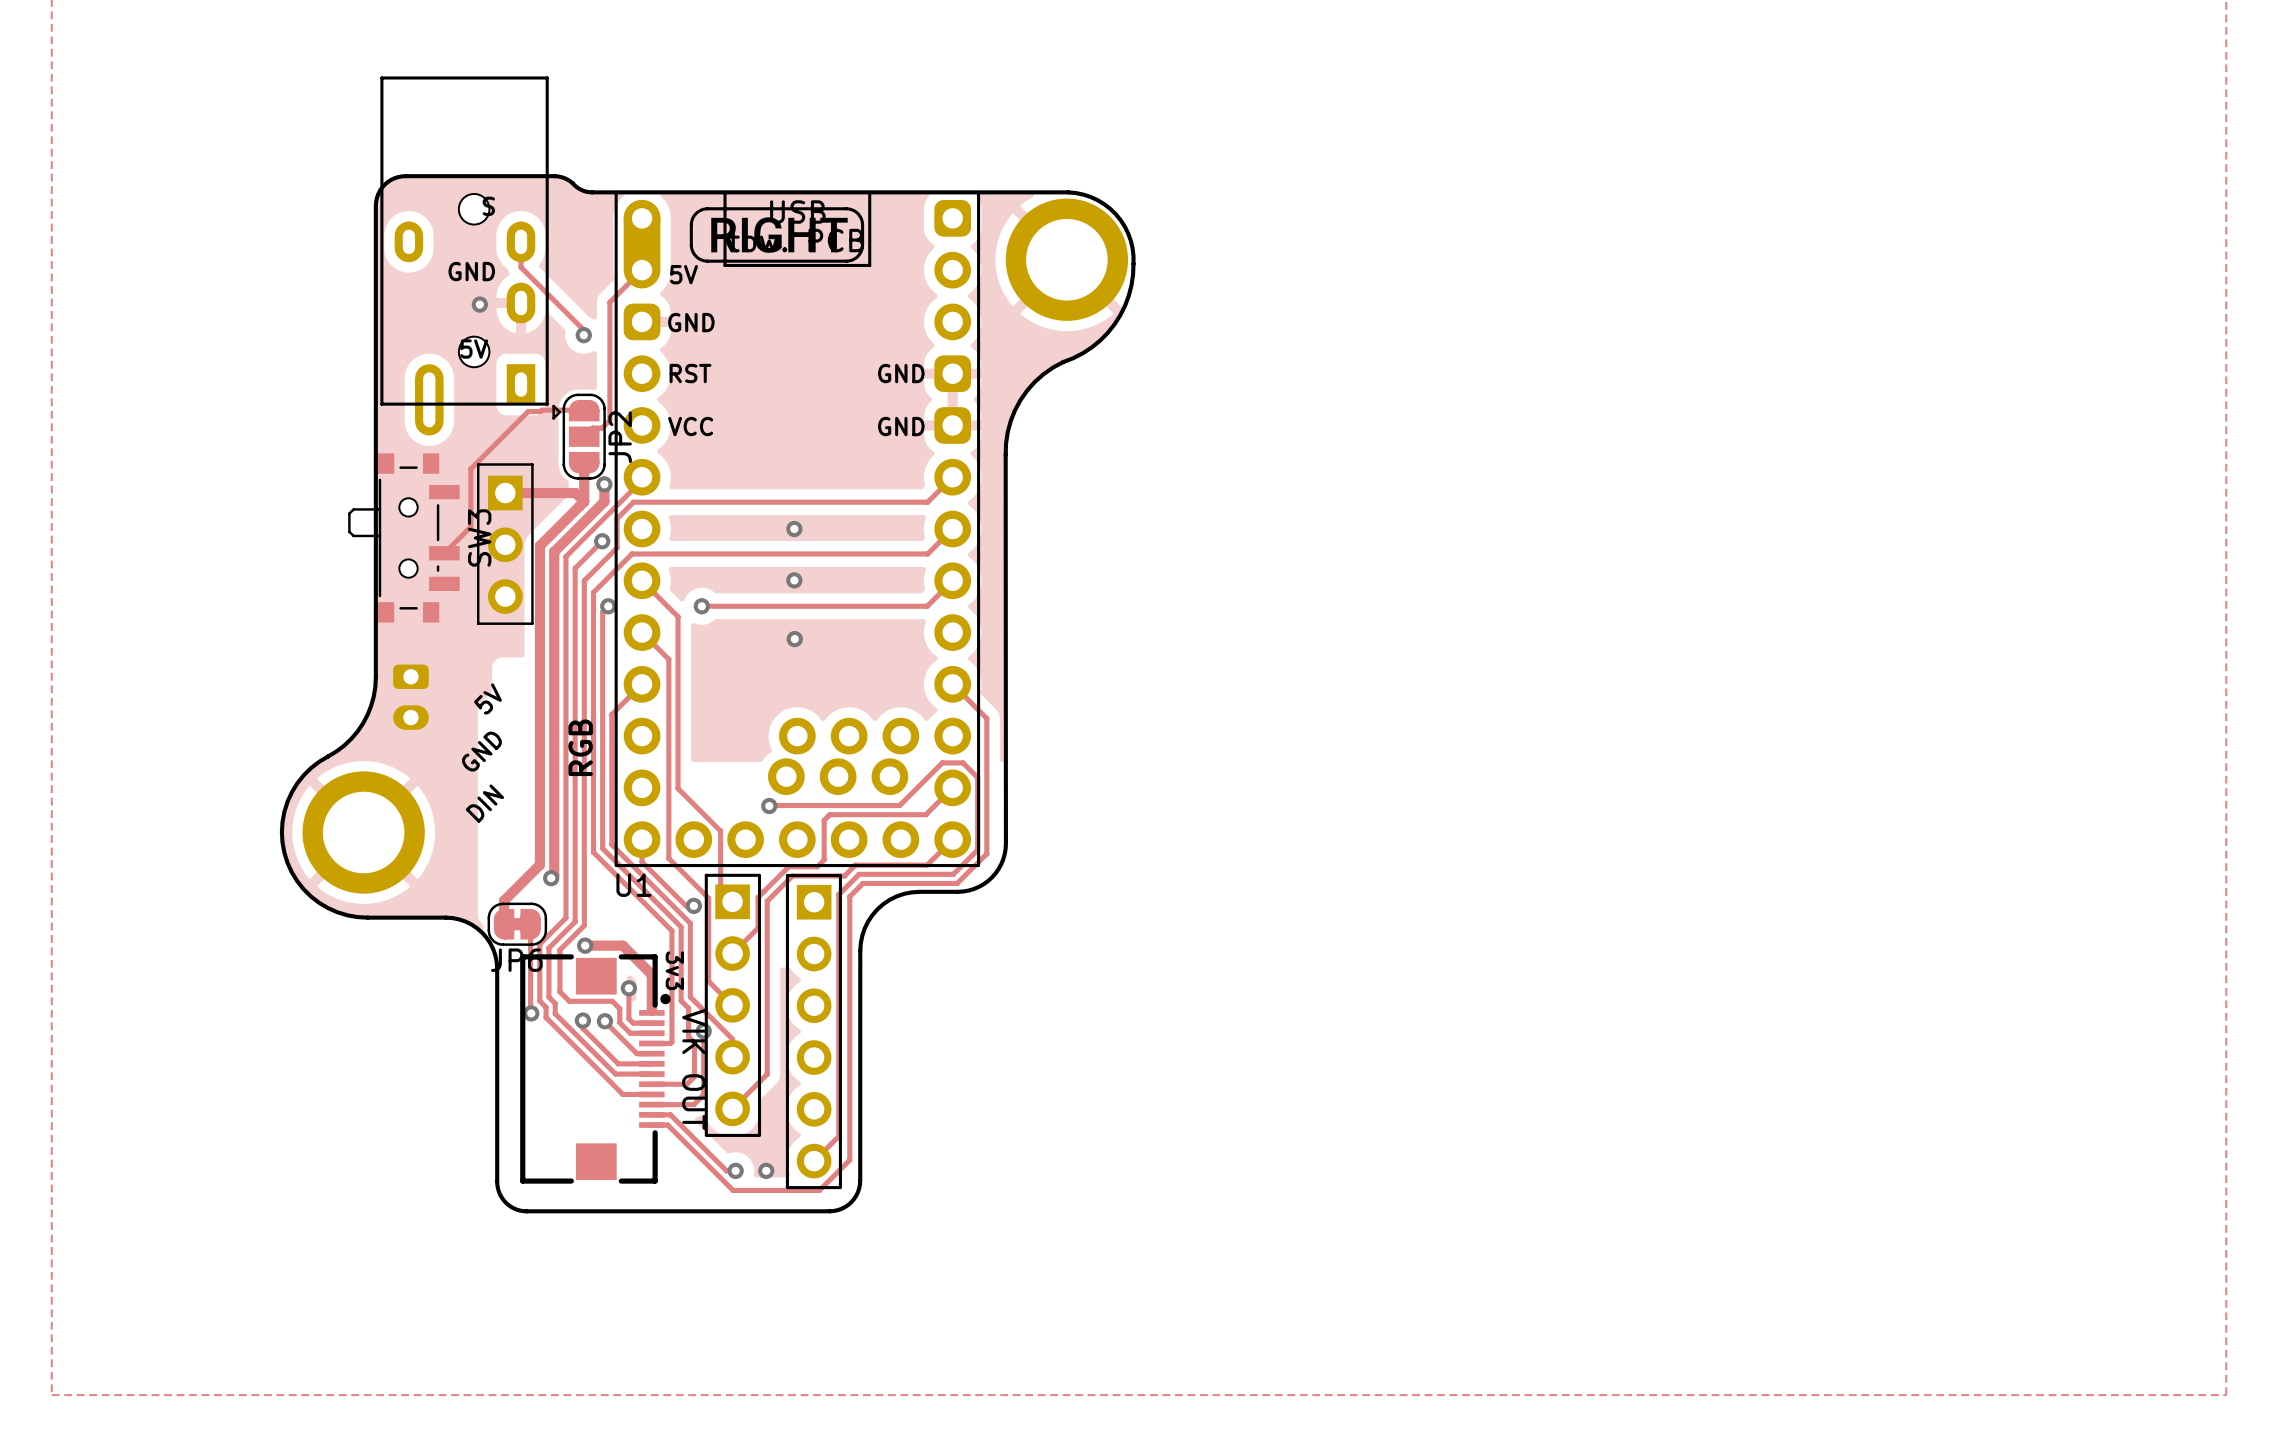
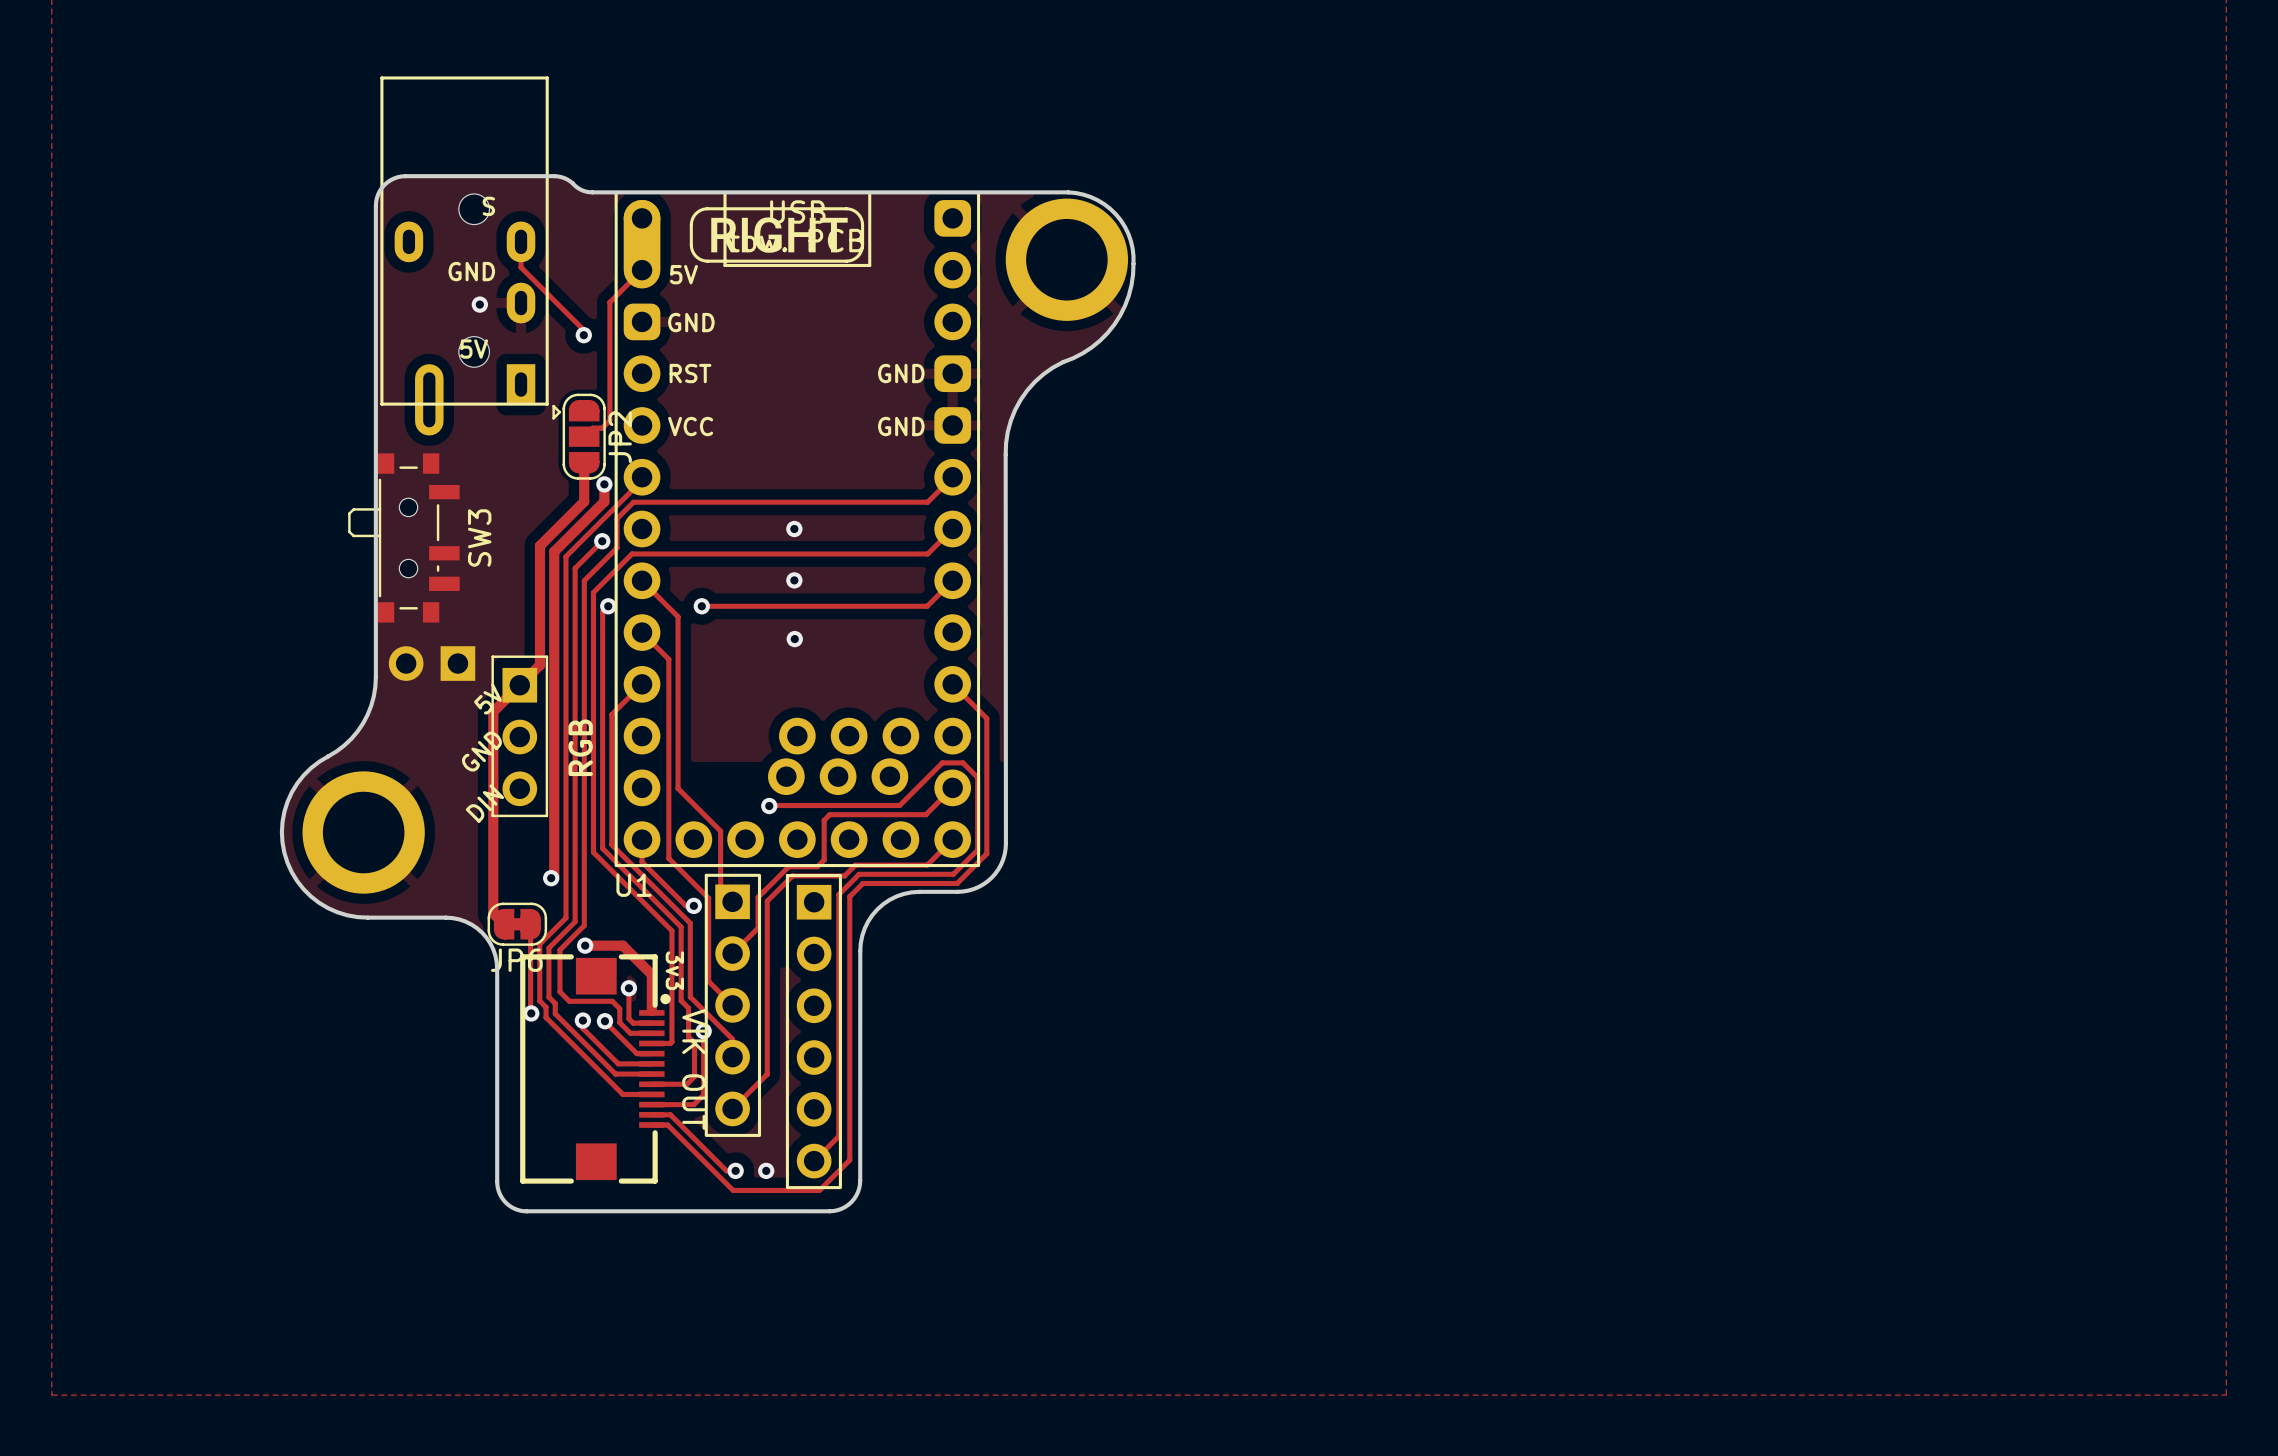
track: (584, 410) (528, 411) (470, 468) (470, 526) (444, 553) -> none
track: (505, 493) (575, 493) (584, 501) -> none
part position: (505, 544) -> (519, 736)
part: none -> (432, 663)
track: (539, 665) (539, 864) (504, 900) (504, 924) -> (539, 665) (493, 711) (493, 913) (504, 924)
part: (410, 697) -> none

